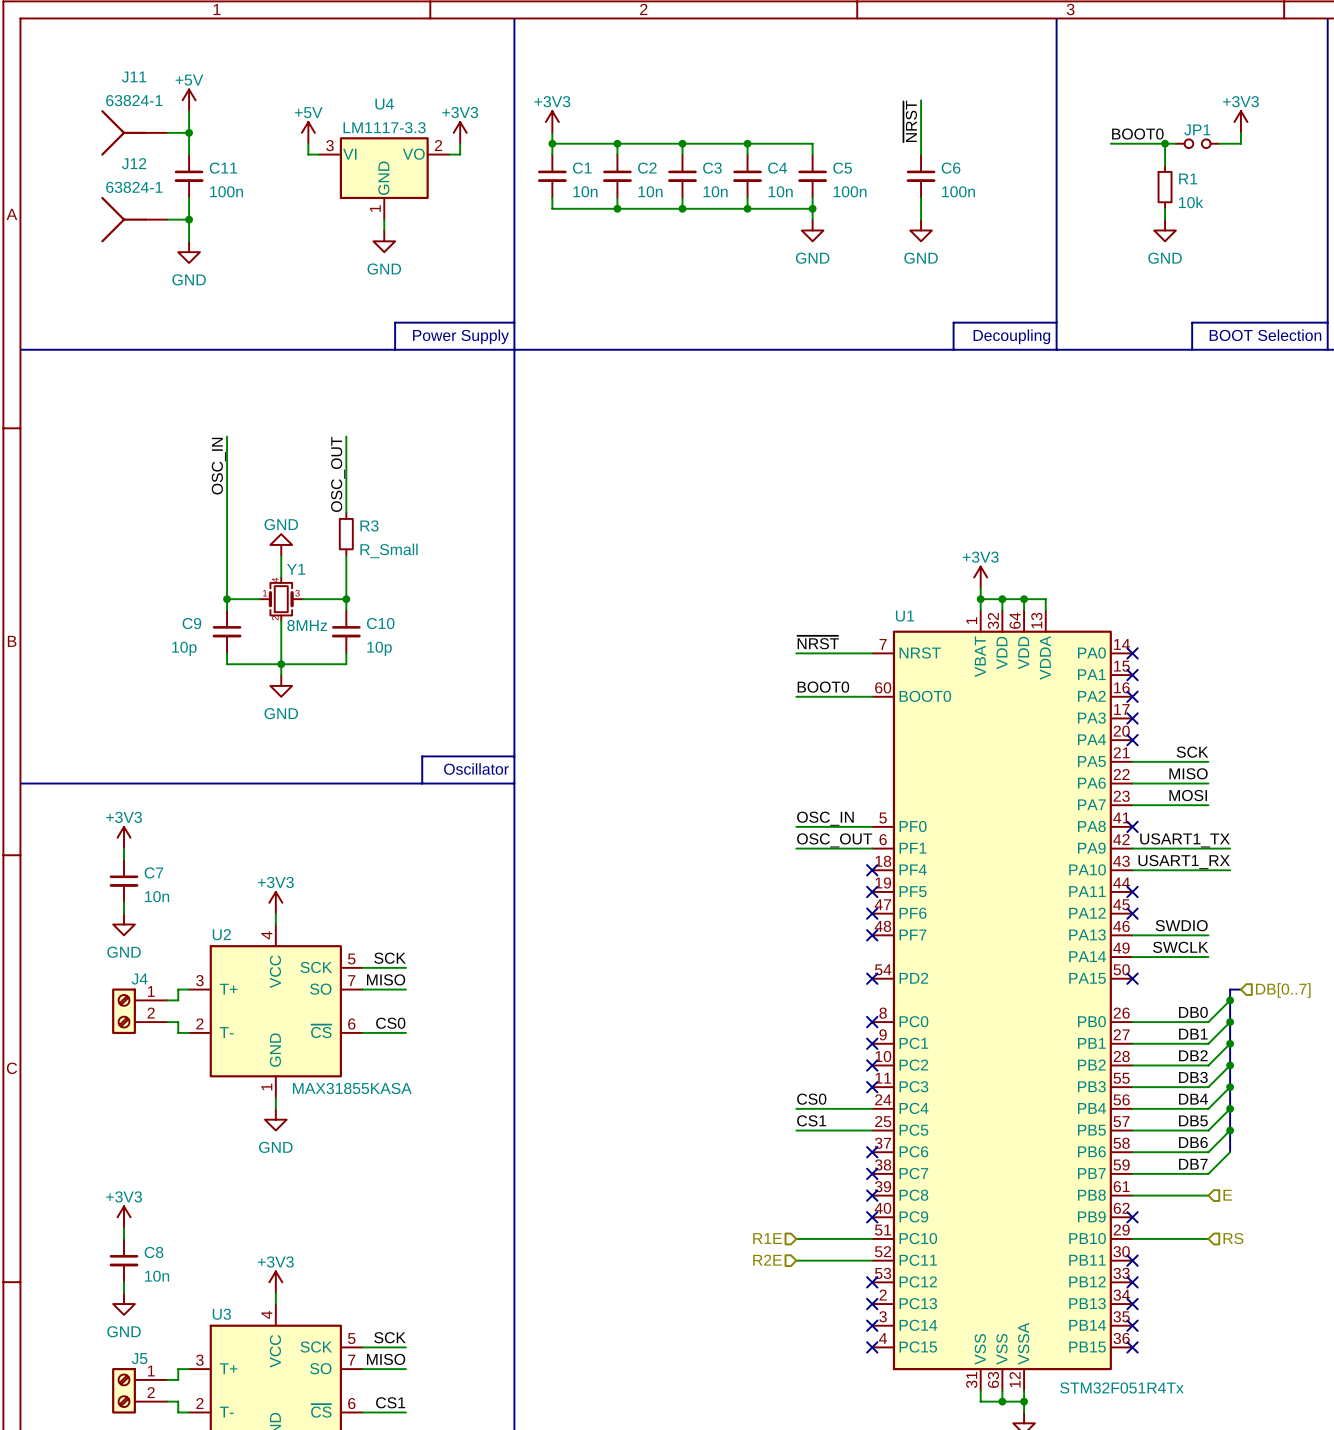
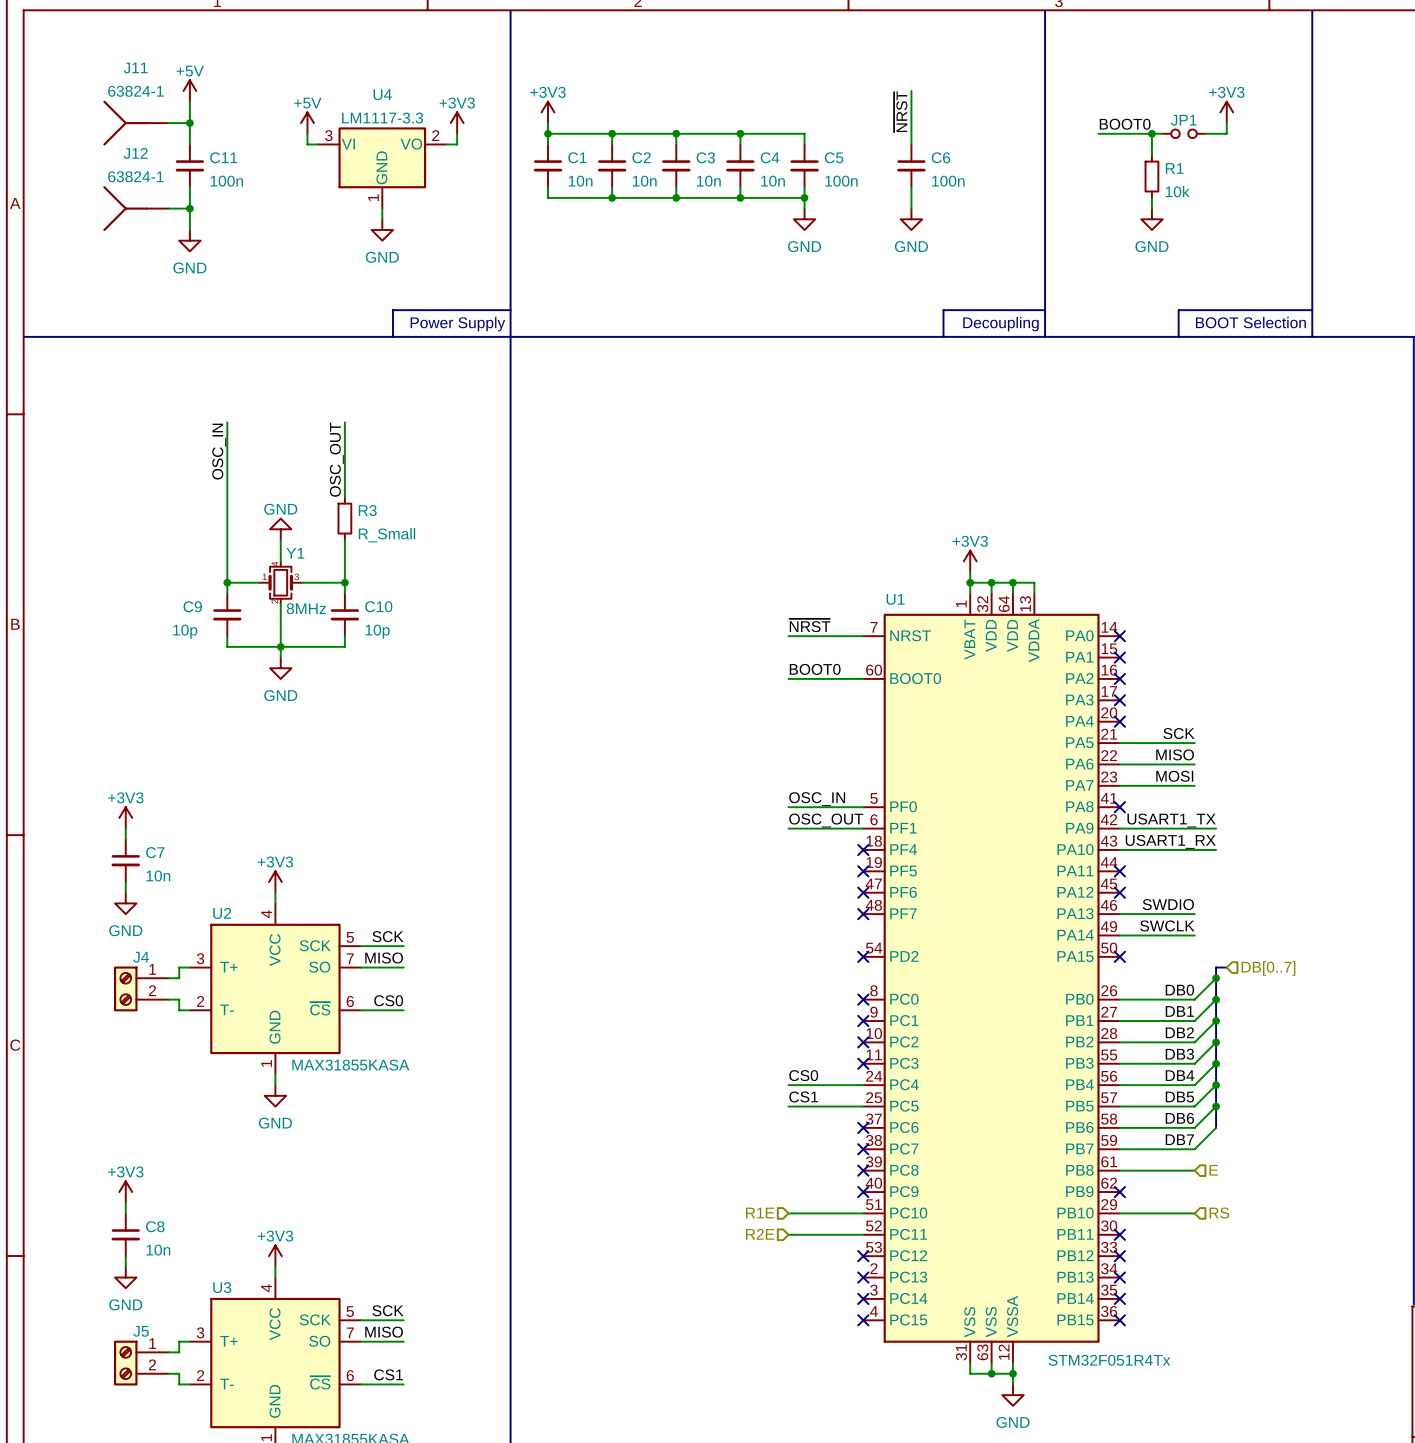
line: (514, 756) (422, 756) (422, 783) -> none
text: Oscillator (476, 769) -> none
line: (21, 783) (514, 783) -> none

